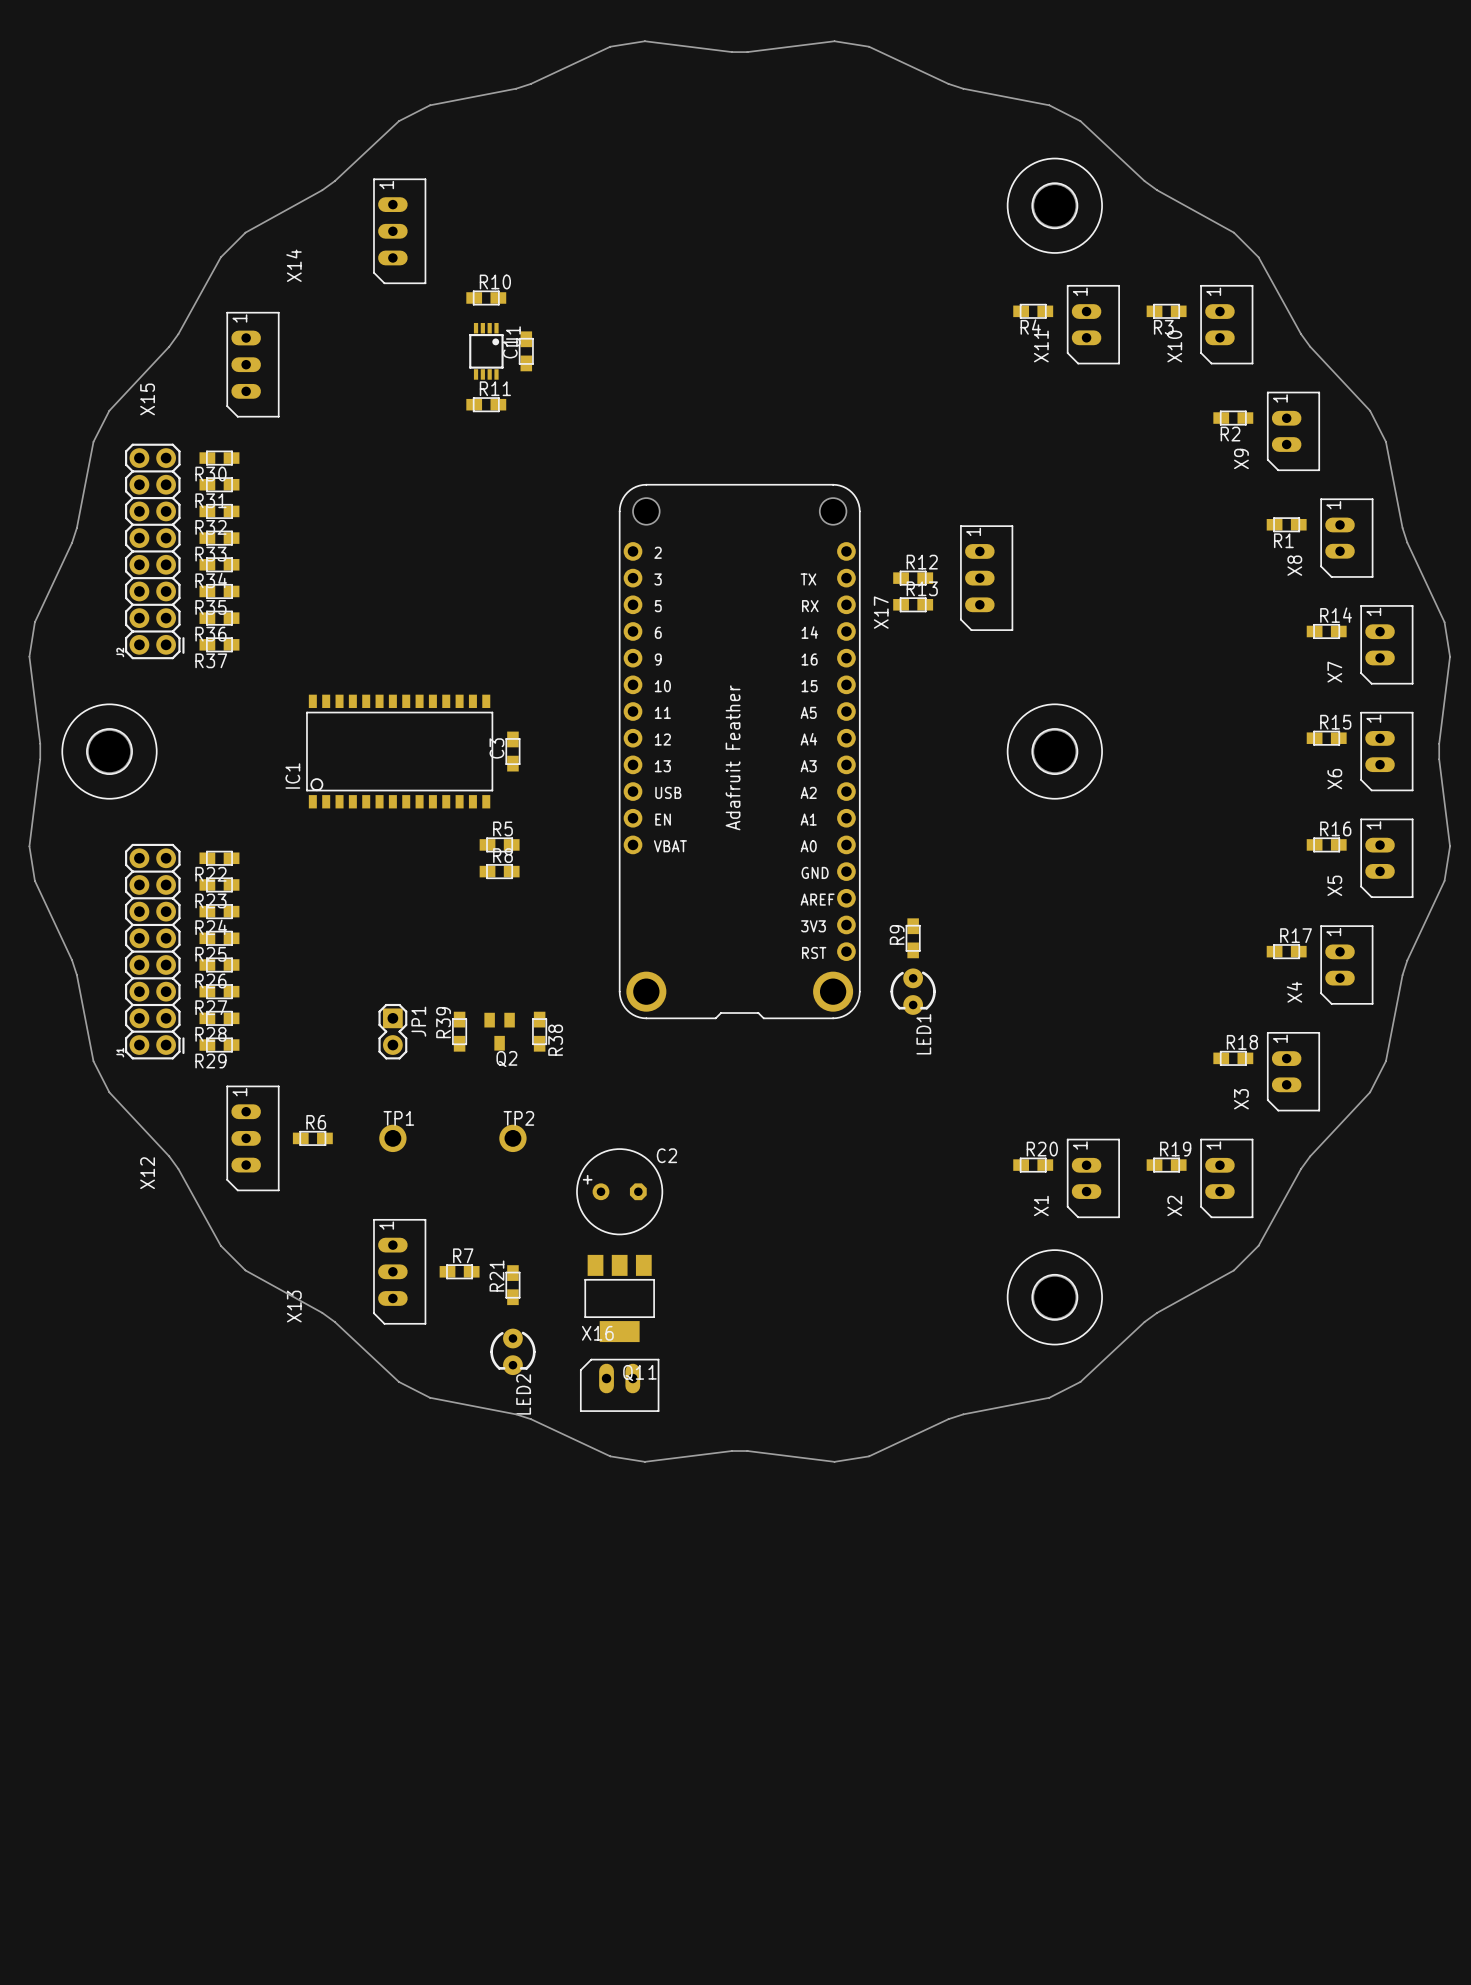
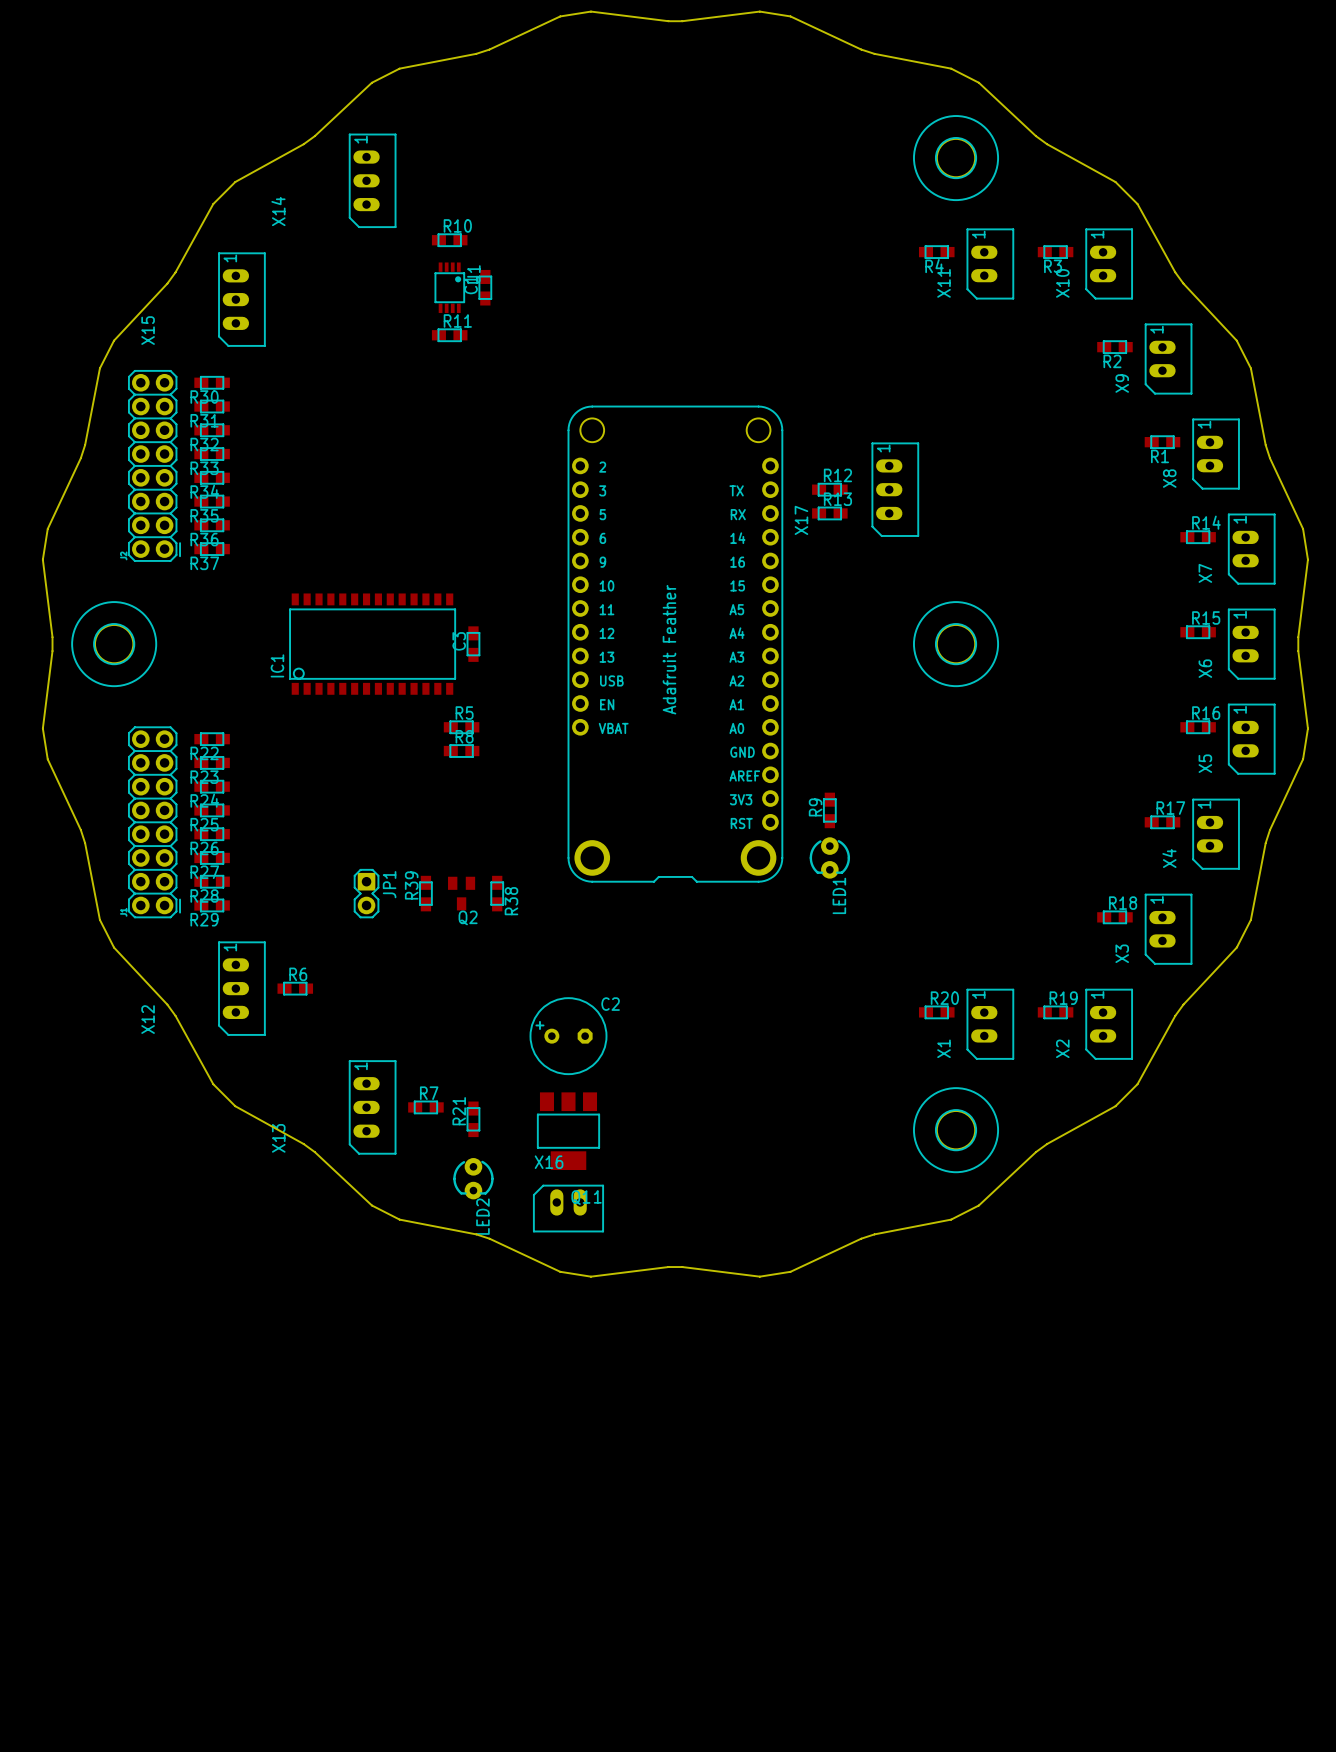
TP1: (392, 1138) -> none
TP2: (512, 1138) -> none

